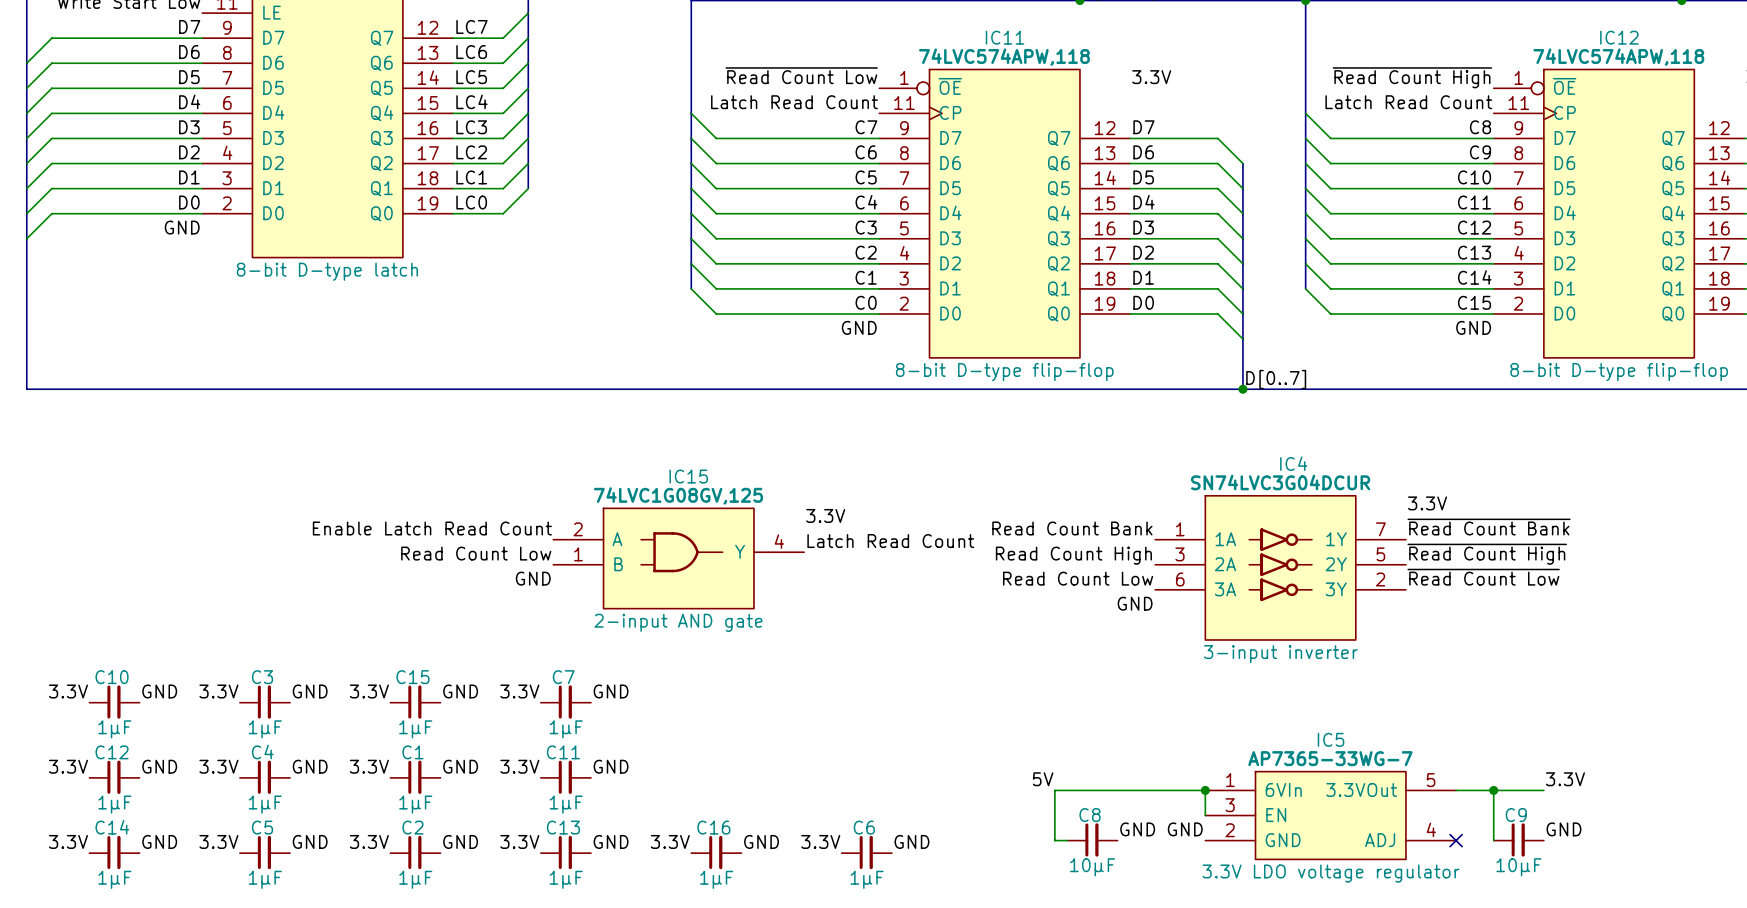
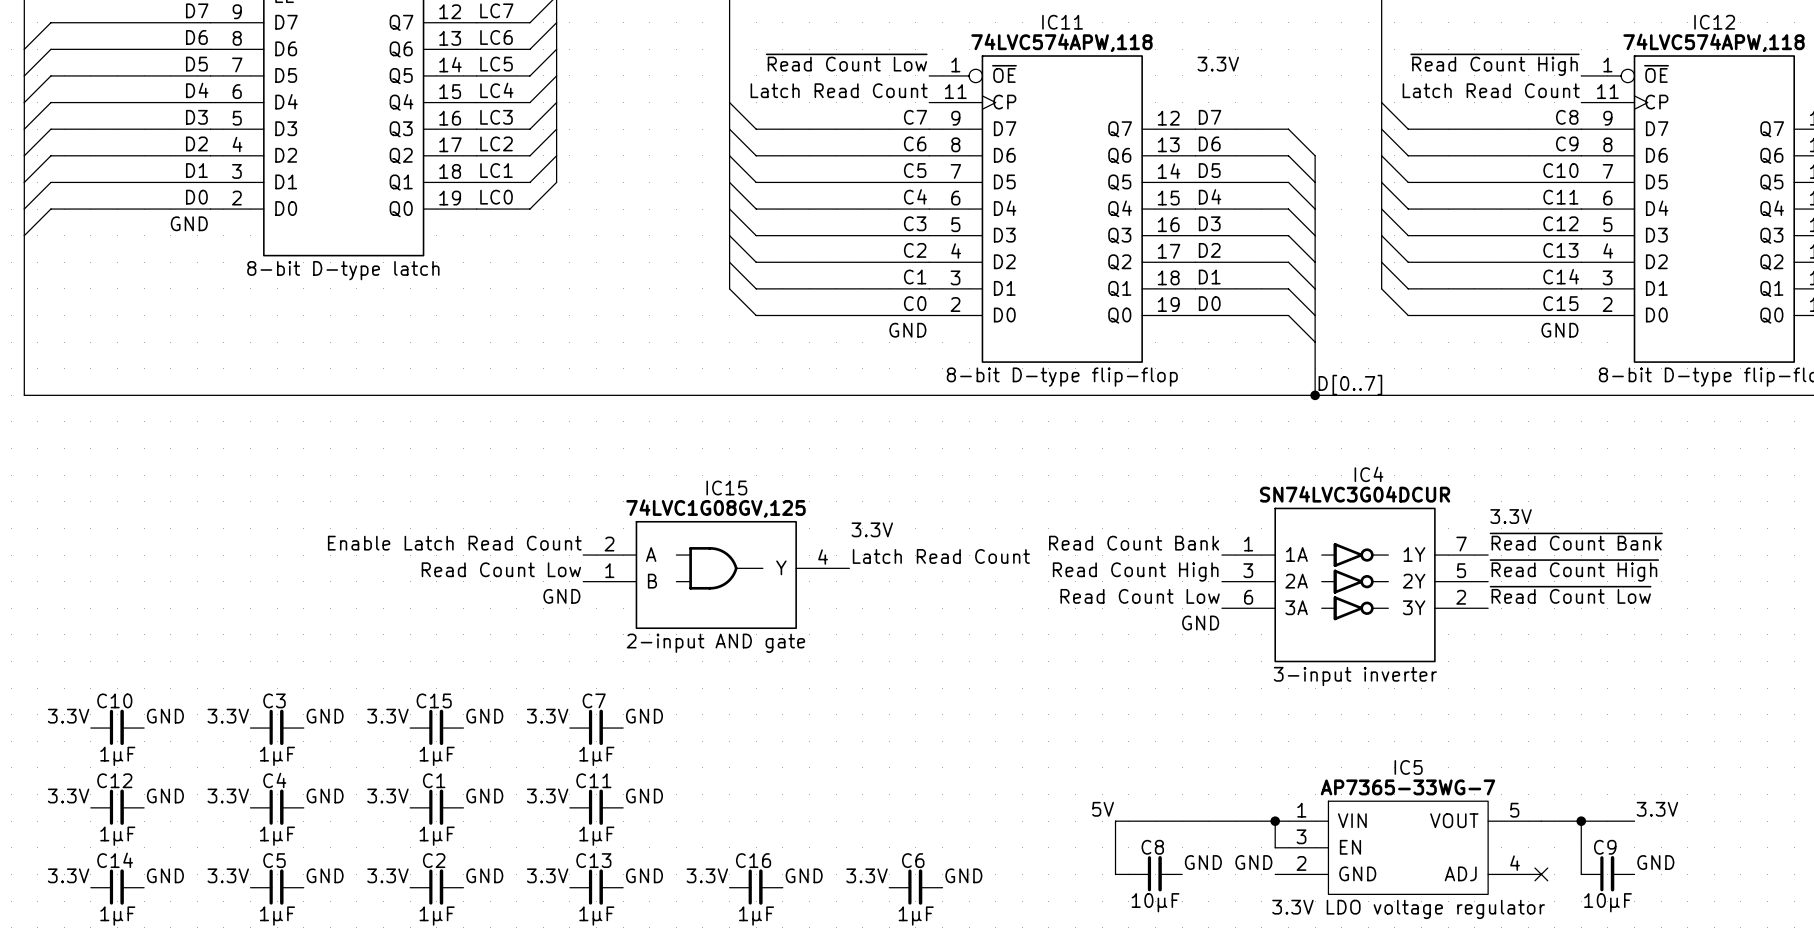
IC5 pin name: 6VIn (1283, 789) -> VIN (1352, 820)
IC5 pin name: 3.3VOut (1361, 789) -> VOUT (1454, 820)

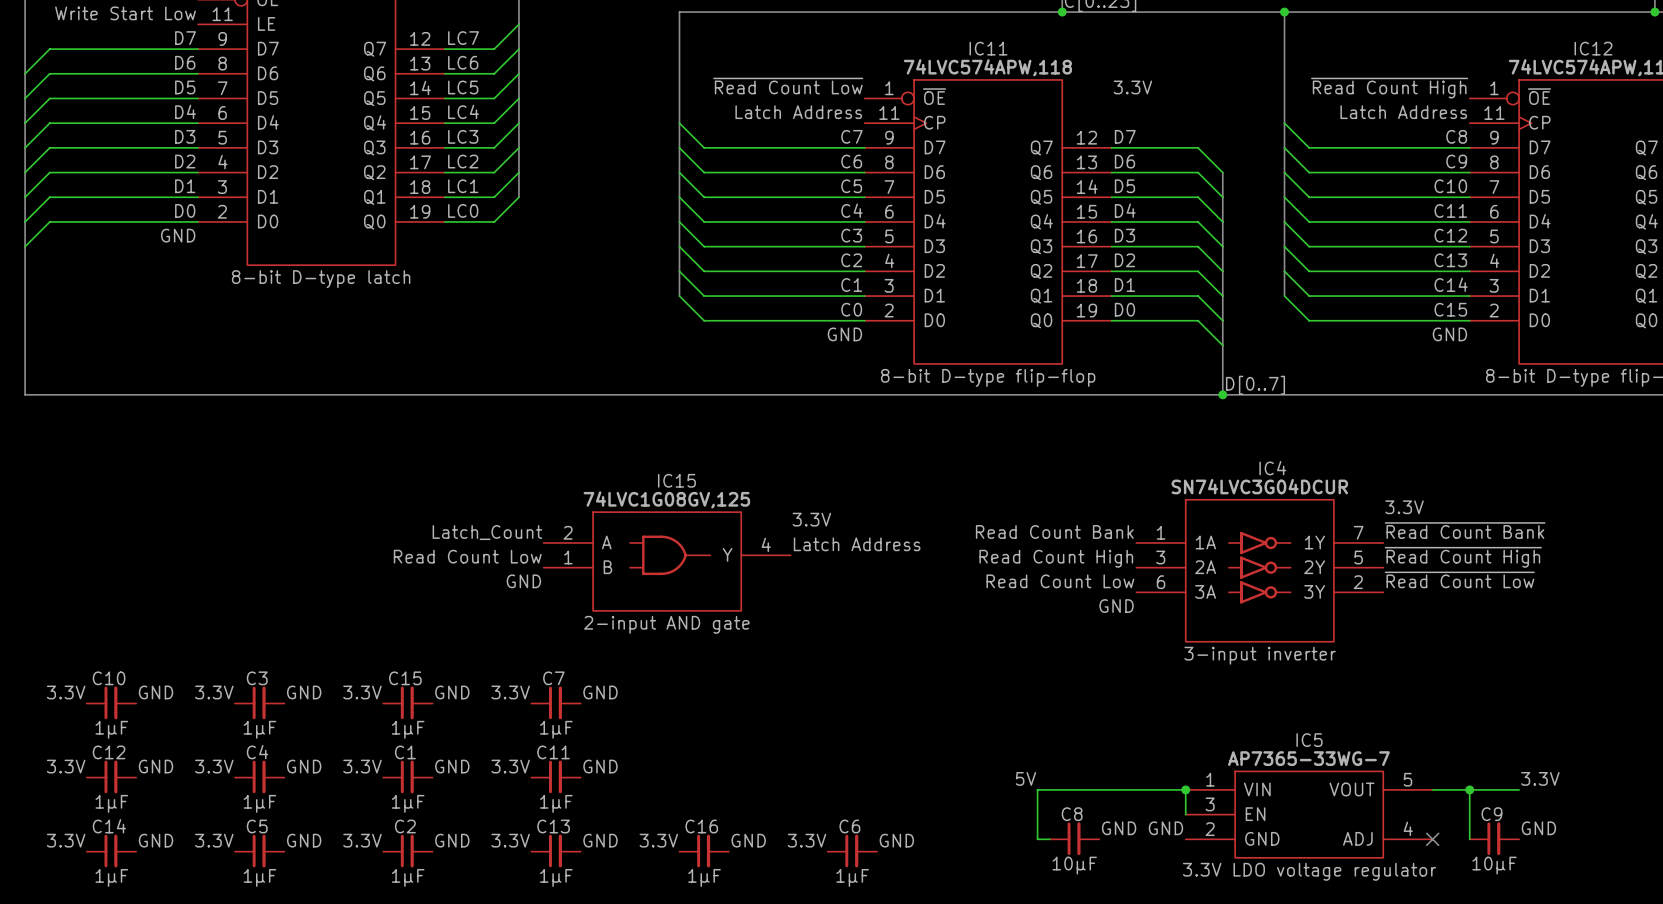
label: Latch Read Count (839, 90) -> Latch Address (798, 112)
label: Latch Read Count (1491, 90) -> Latch Address (1403, 112)
label: Enable Latch Read Count (454, 543) -> Latch_Count (487, 532)
label: Latch Read Count (941, 556) -> Latch Address (857, 544)

